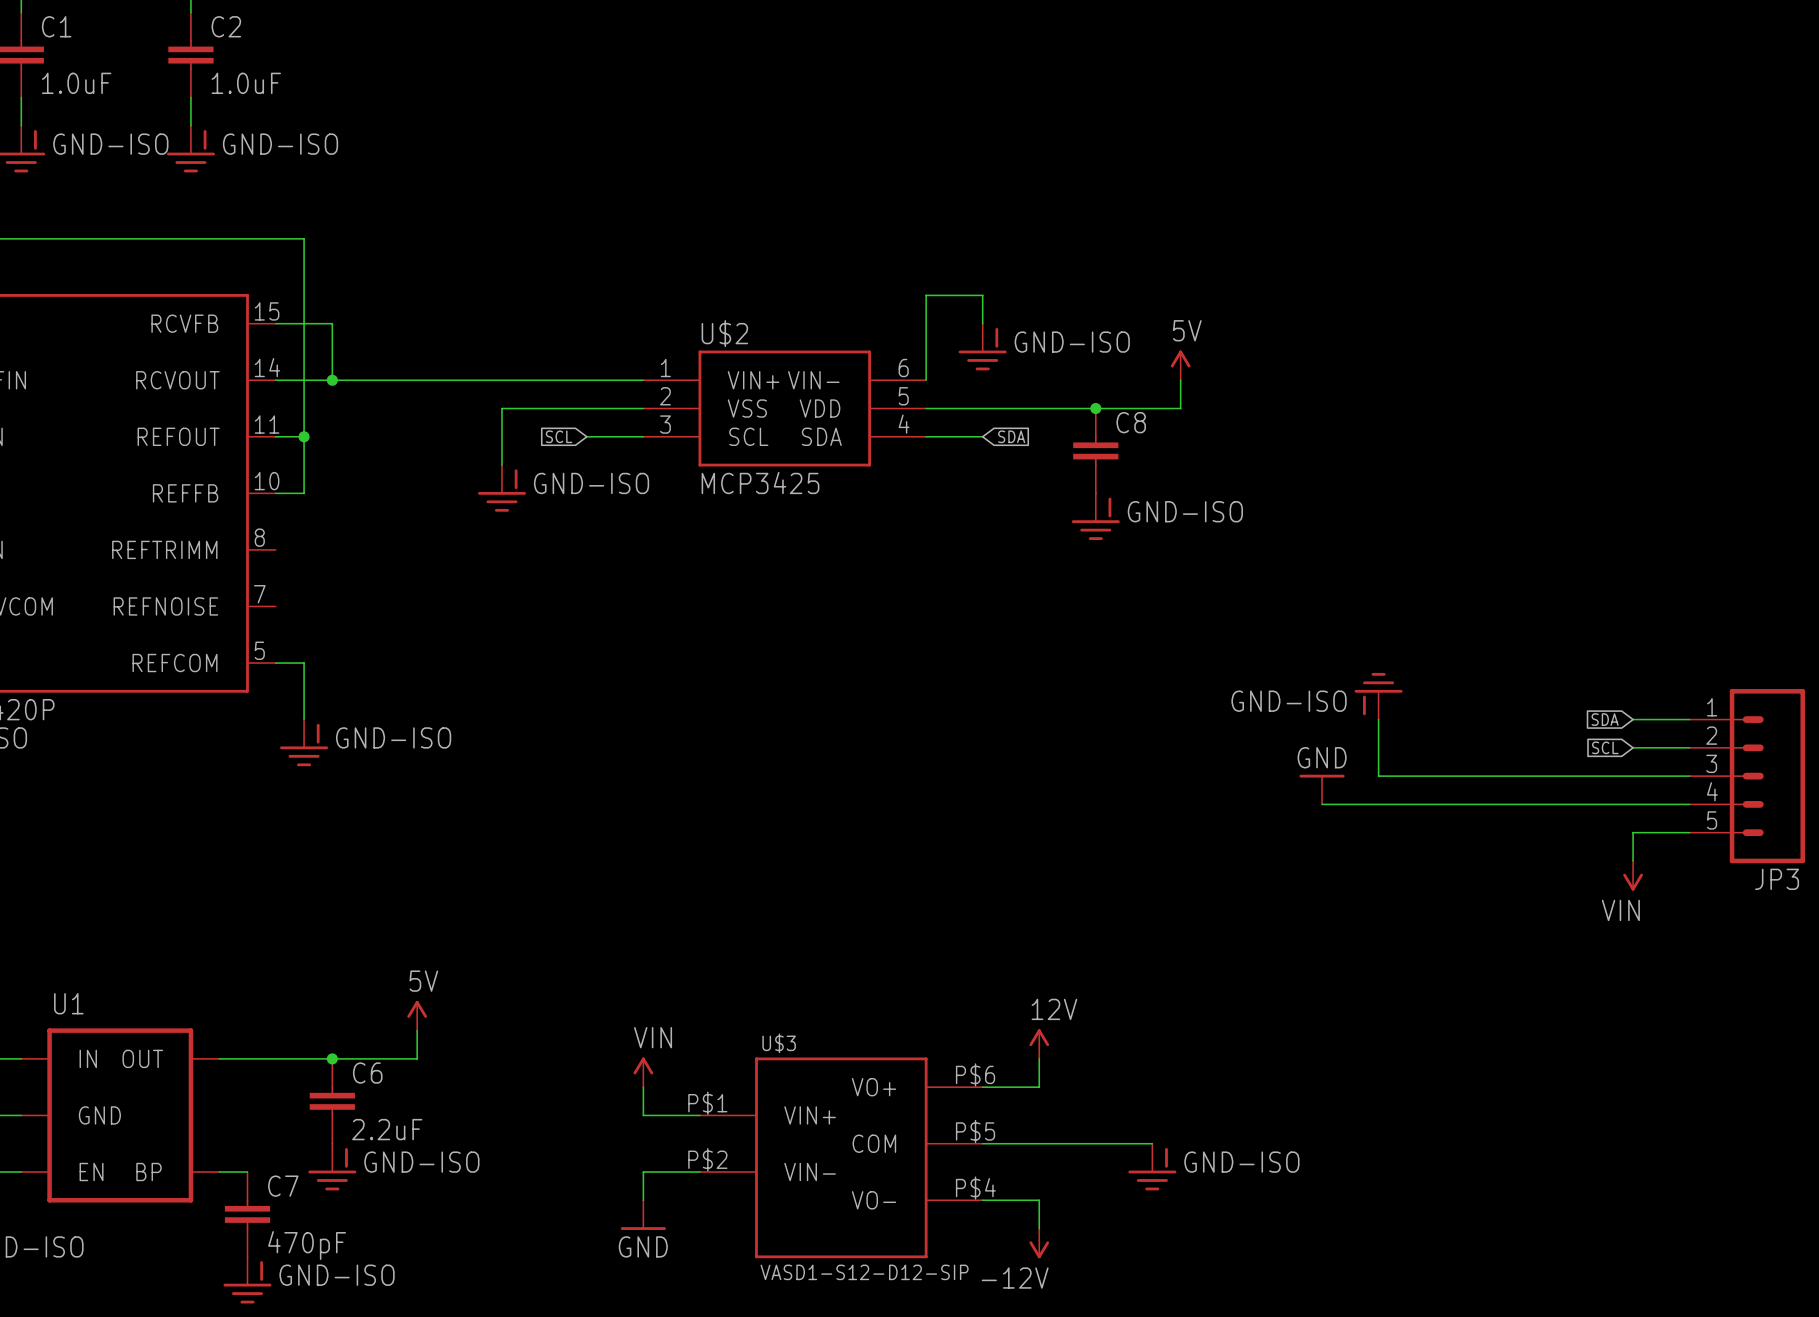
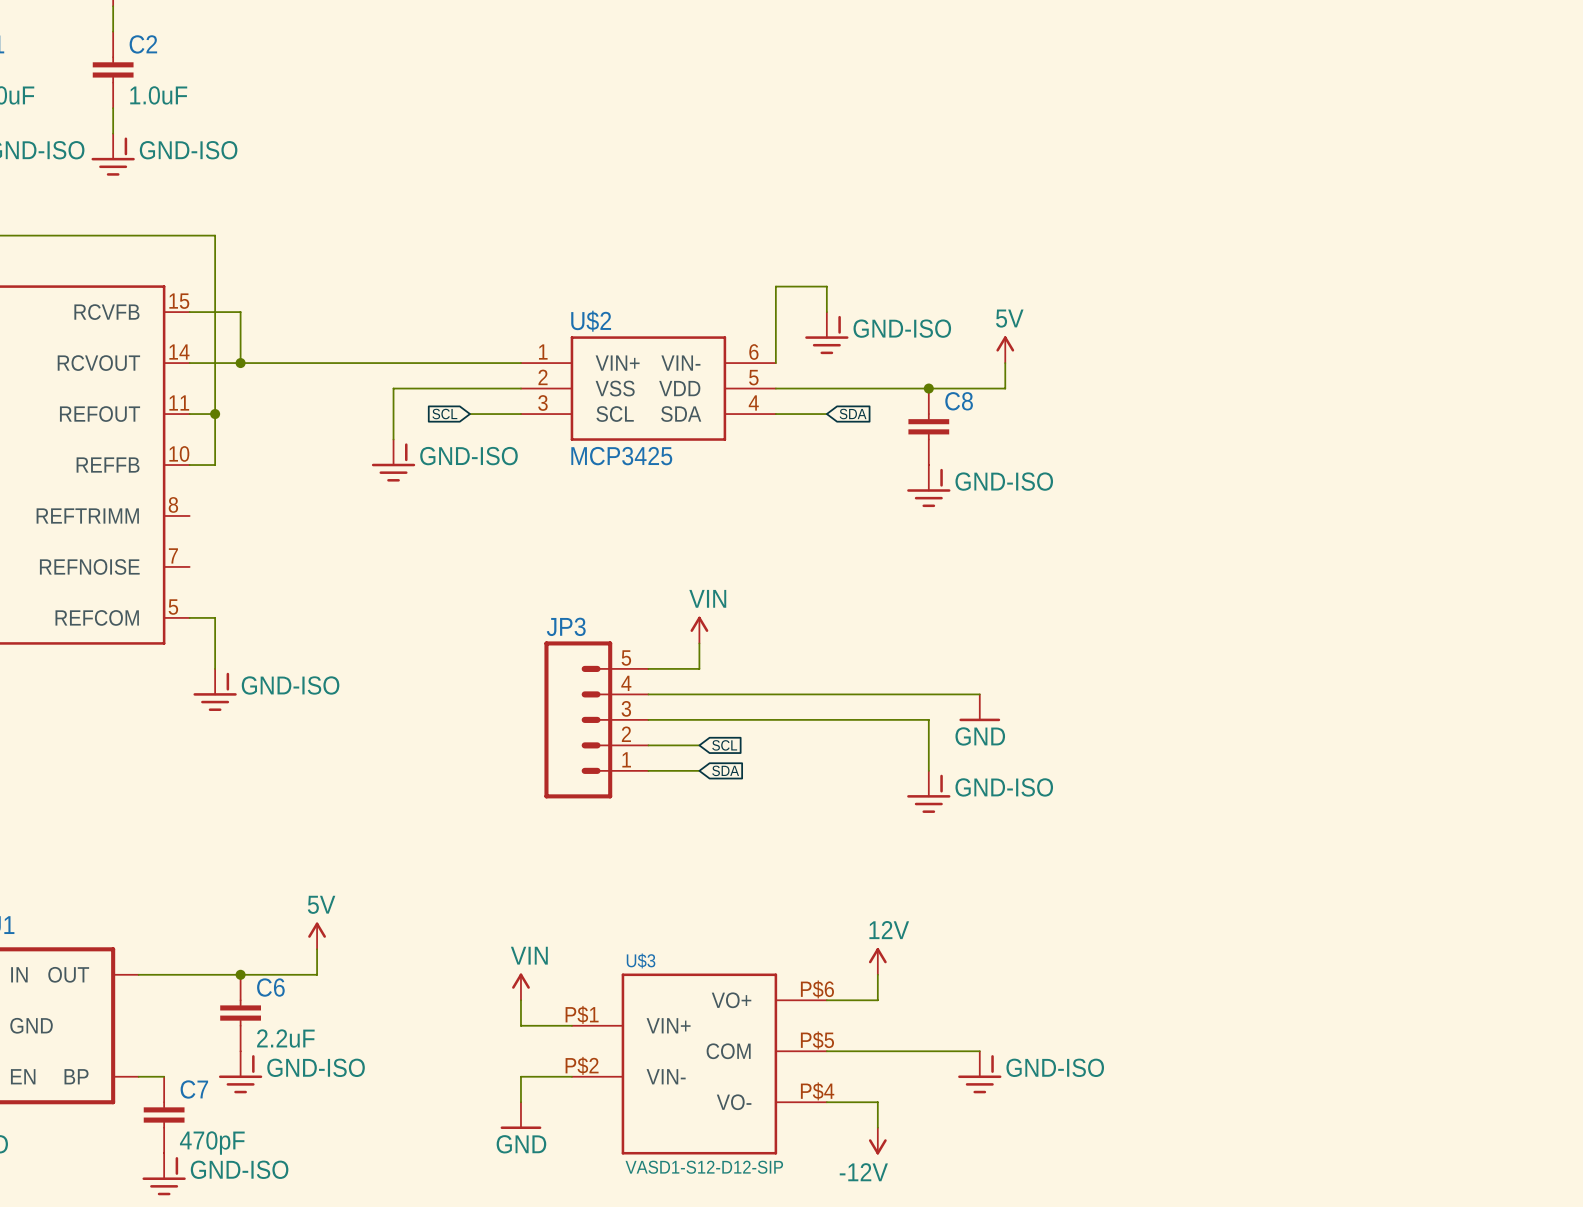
power symbol: none -> VIN (699, 630)
wire: none -> (699, 643) (699, 668) (648, 668)
power symbol: GND-ISO (1378, 696) -> none
wire: (1378, 719) (1378, 776) (1689, 776) -> none
global label: SDA (1605, 719) -> none
wire: (1633, 719) (1689, 719) -> none
wire: none -> (648, 694) (979, 694)
global label: SCL (1605, 747) -> none
wire: (1633, 747) (1689, 747) -> none
wire: none -> (648, 719) (928, 719) (928, 770)
power symbol rotation: 0° (1322, 776) -> 180° (979, 719)
JP3 position: (1747, 776) -> (596, 719)
JP3 rotation: 0° (1767, 776) -> 180° (578, 719)
power symbol position: GND (1322, 789) -> GND (979, 707)
wire: none -> (648, 745) (699, 745)
global label: none -> SCL (724, 745)
wire: (1322, 804) (1689, 804) -> none
wire: none -> (648, 770) (699, 770)
global label: none -> SDA (725, 770)
wire: (1689, 832) (1633, 832) (1633, 860) -> none
power symbol: none -> GND-ISO (928, 791)
power symbol: VIN (1633, 875) -> none

